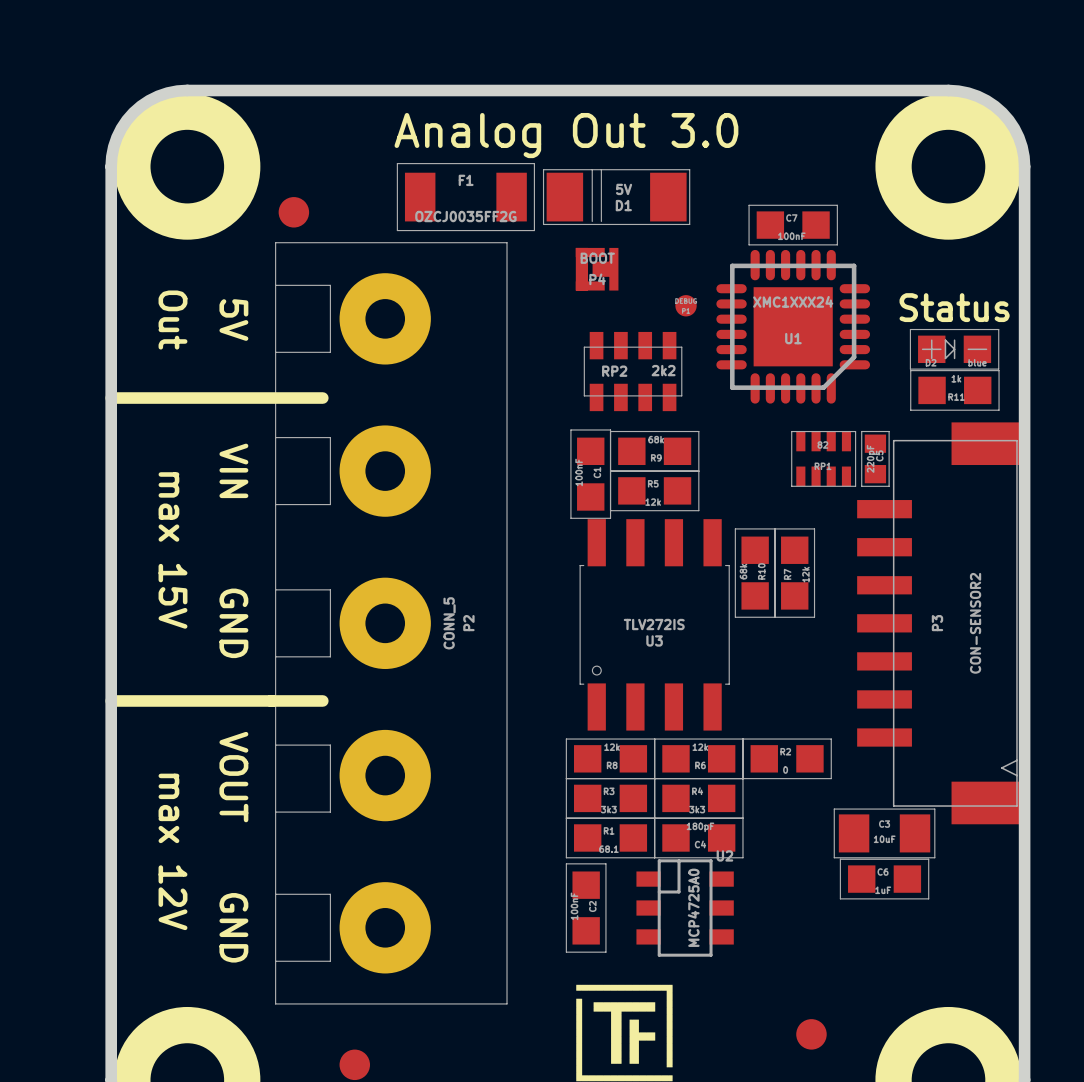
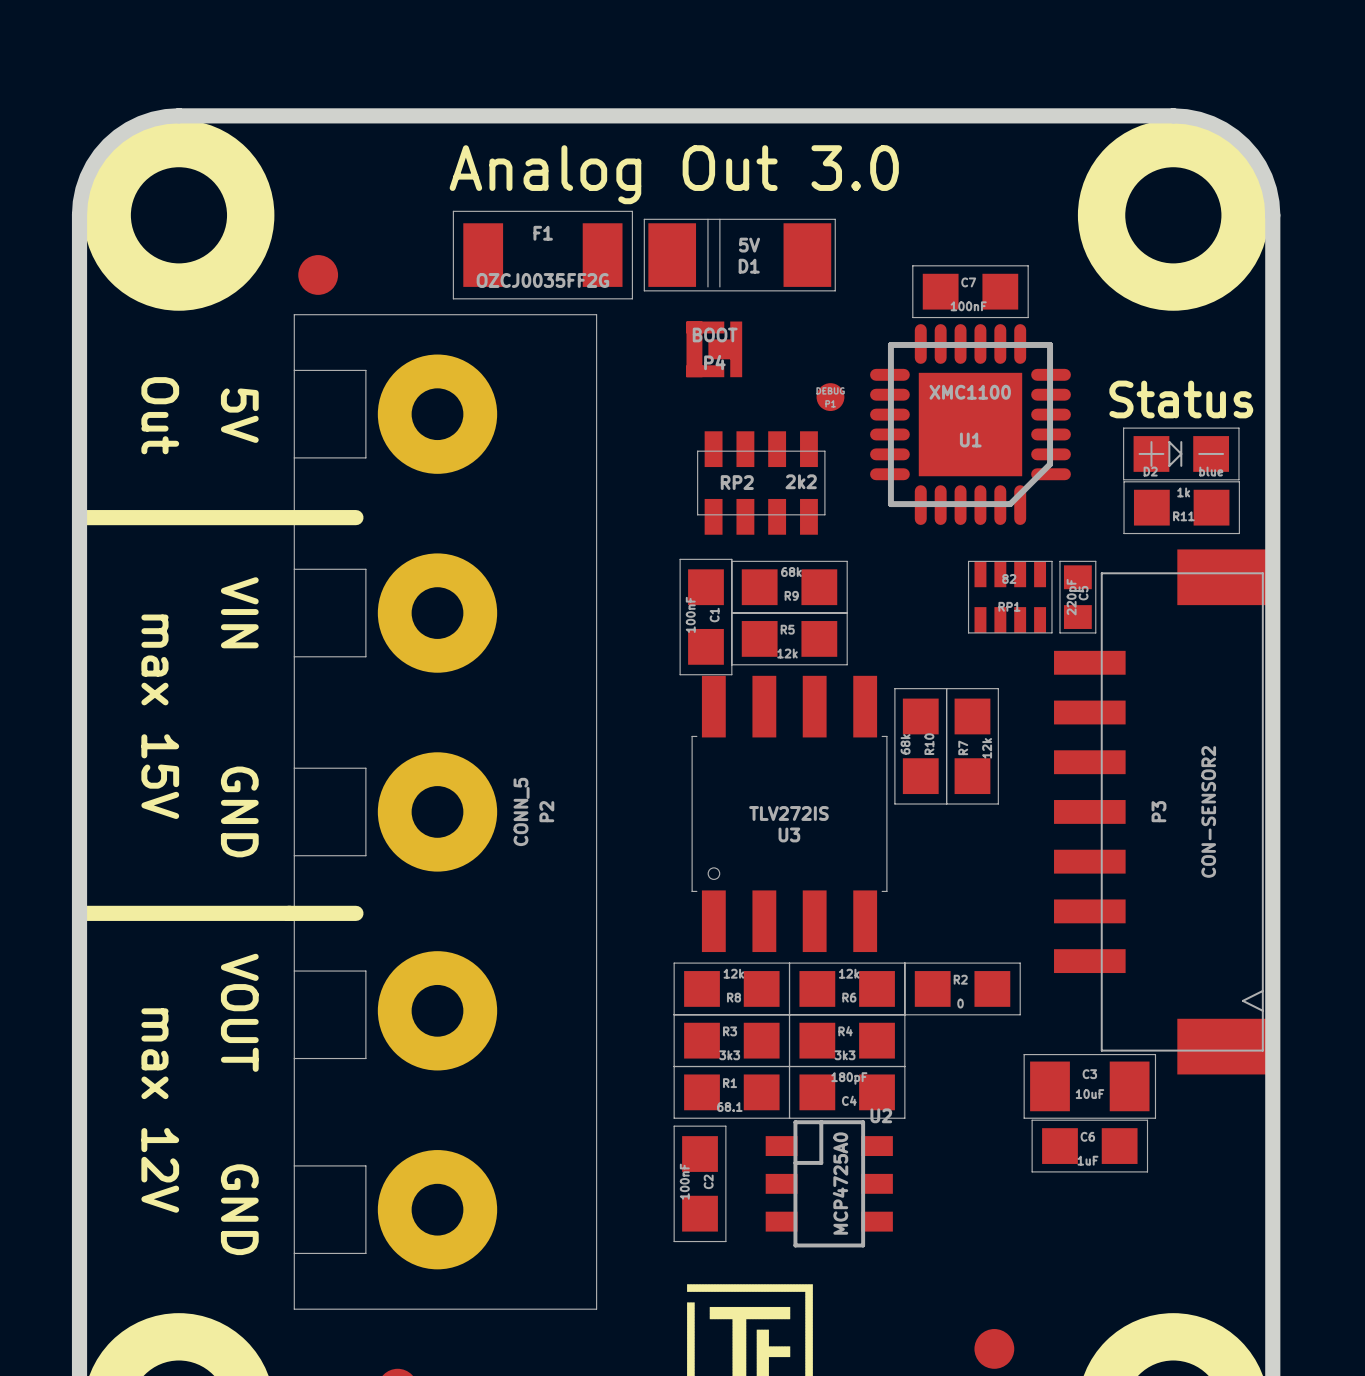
U1 value: XMC1XXX24 (793, 301) -> XMC1100 (970, 392)

